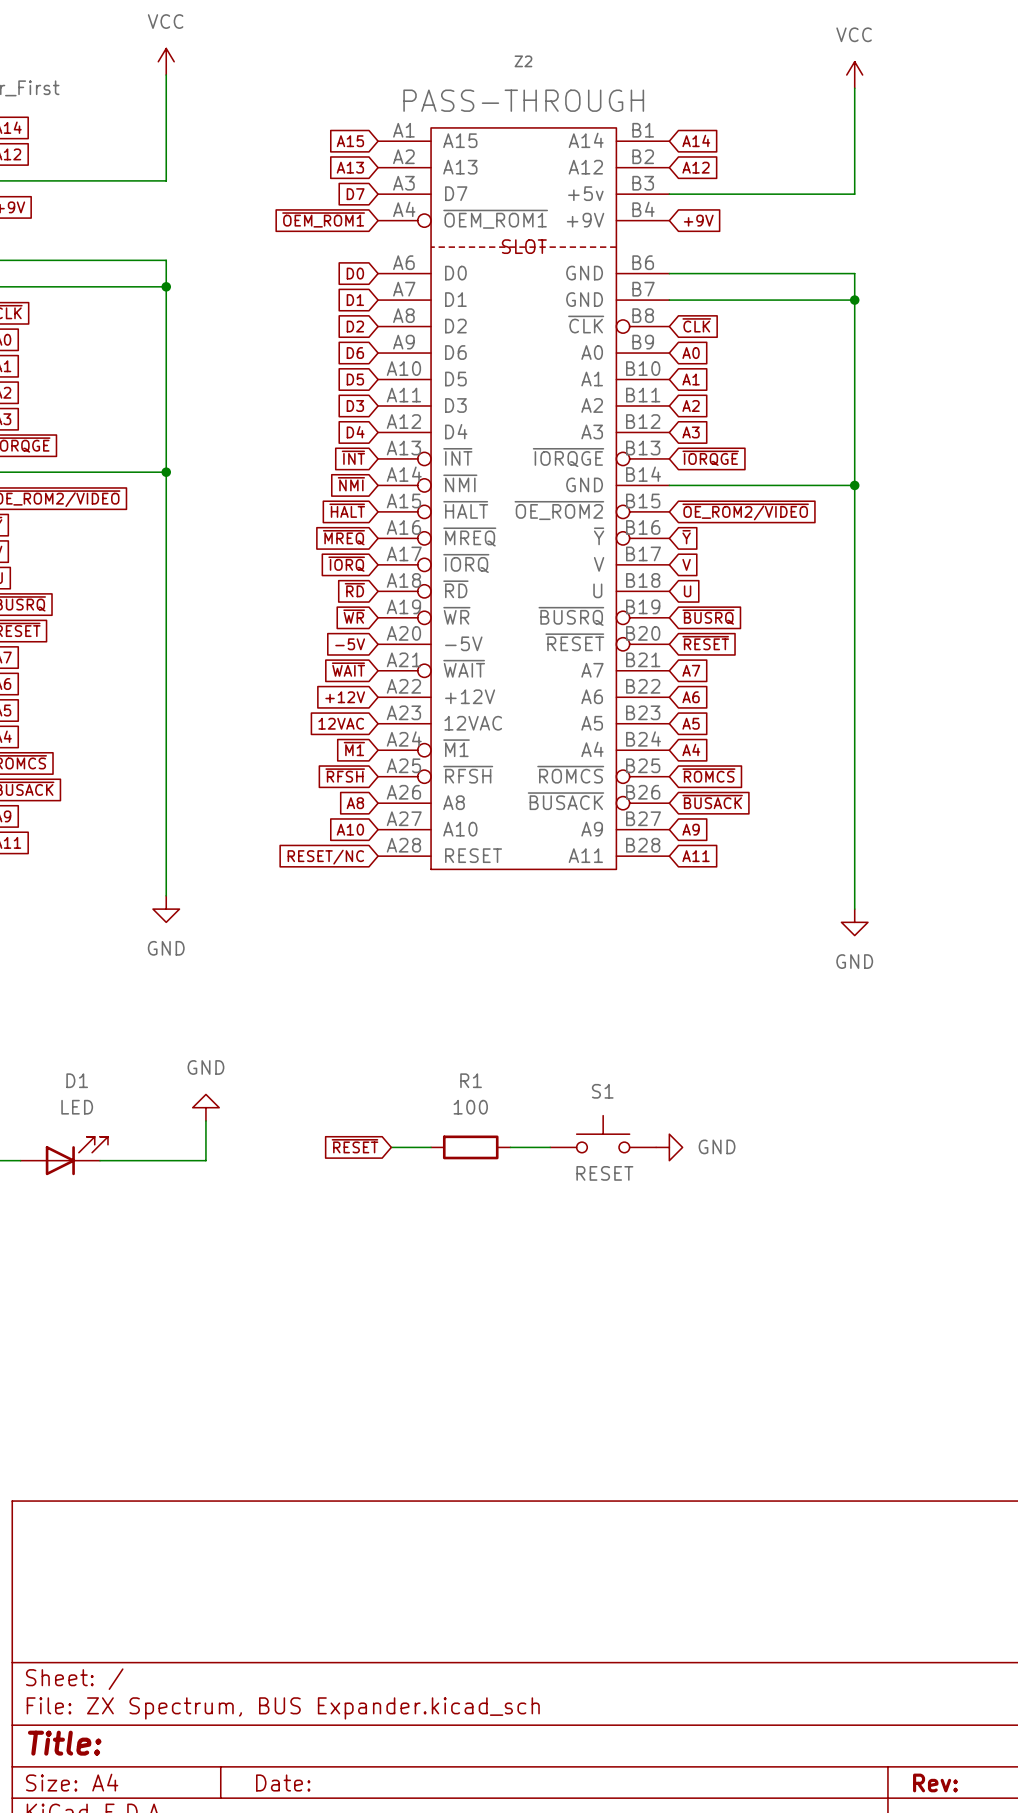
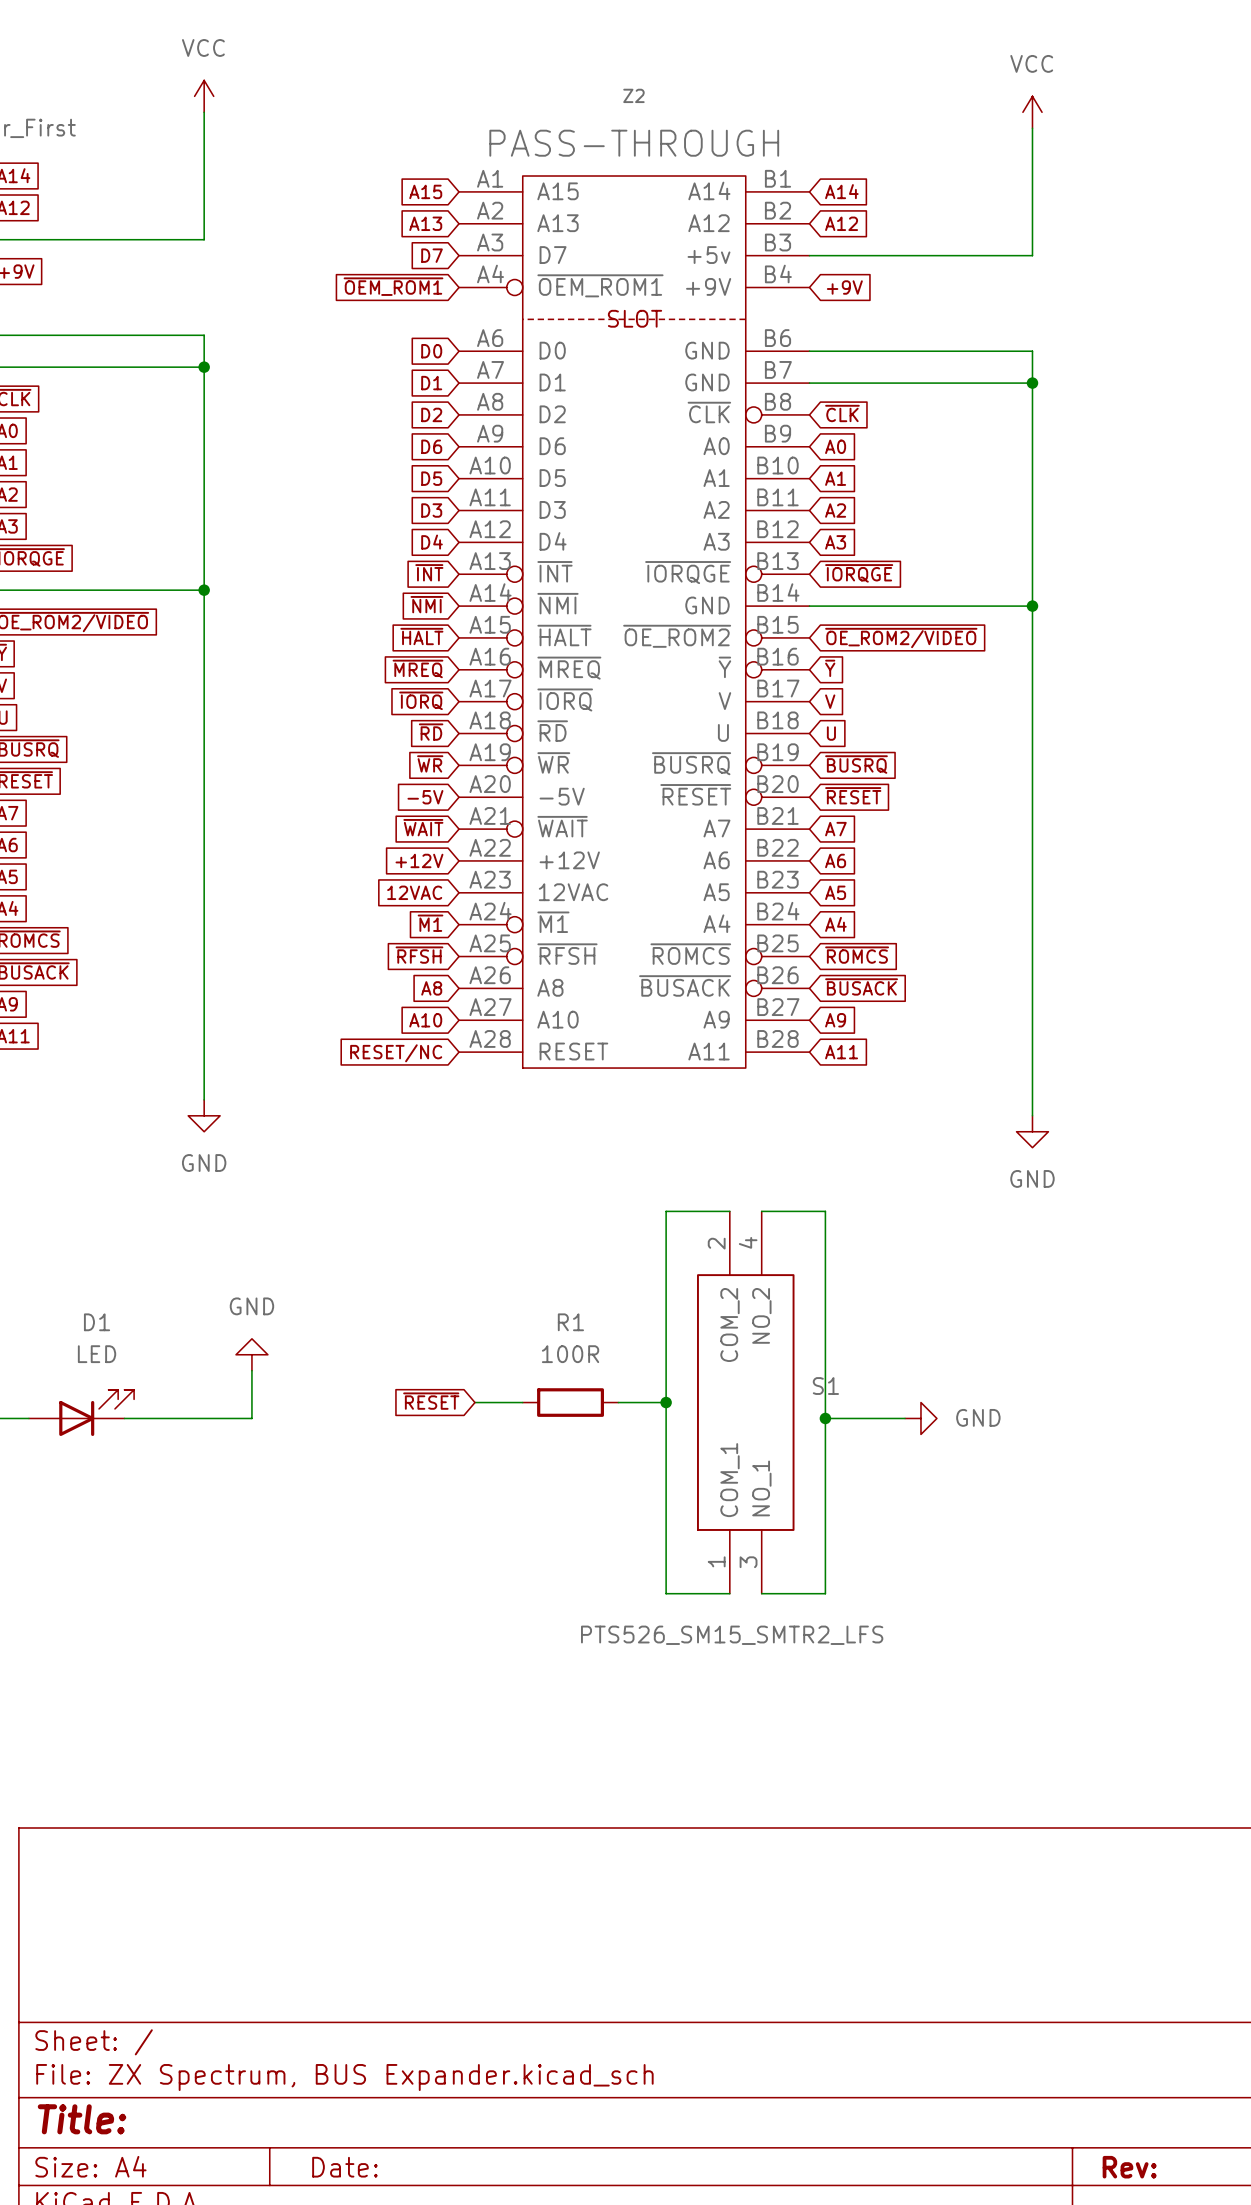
wire: none -> (729, 1211) (666, 1211) (666, 1593) (729, 1593)
wire: none -> (761, 1211) (825, 1211) (825, 1593) (761, 1593)
S1 name position: S1 (602, 1091) -> S1 (825, 1386)
R1 value: 100 (470, 1107) -> 100R (570, 1354)
S1 symbol: [550, 1115, 657, 1153] -> [697, 1211, 795, 1594]
junction: none -> (666, 1402)
power symbol position: GND (669, 1147) -> GND (920, 1418)
wire: none -> (825, 1418) (905, 1418)
junction: none -> (825, 1418)
S1 value: RESET (604, 1173) -> PTS526_SM15_SMTR2_LFS (732, 1635)

